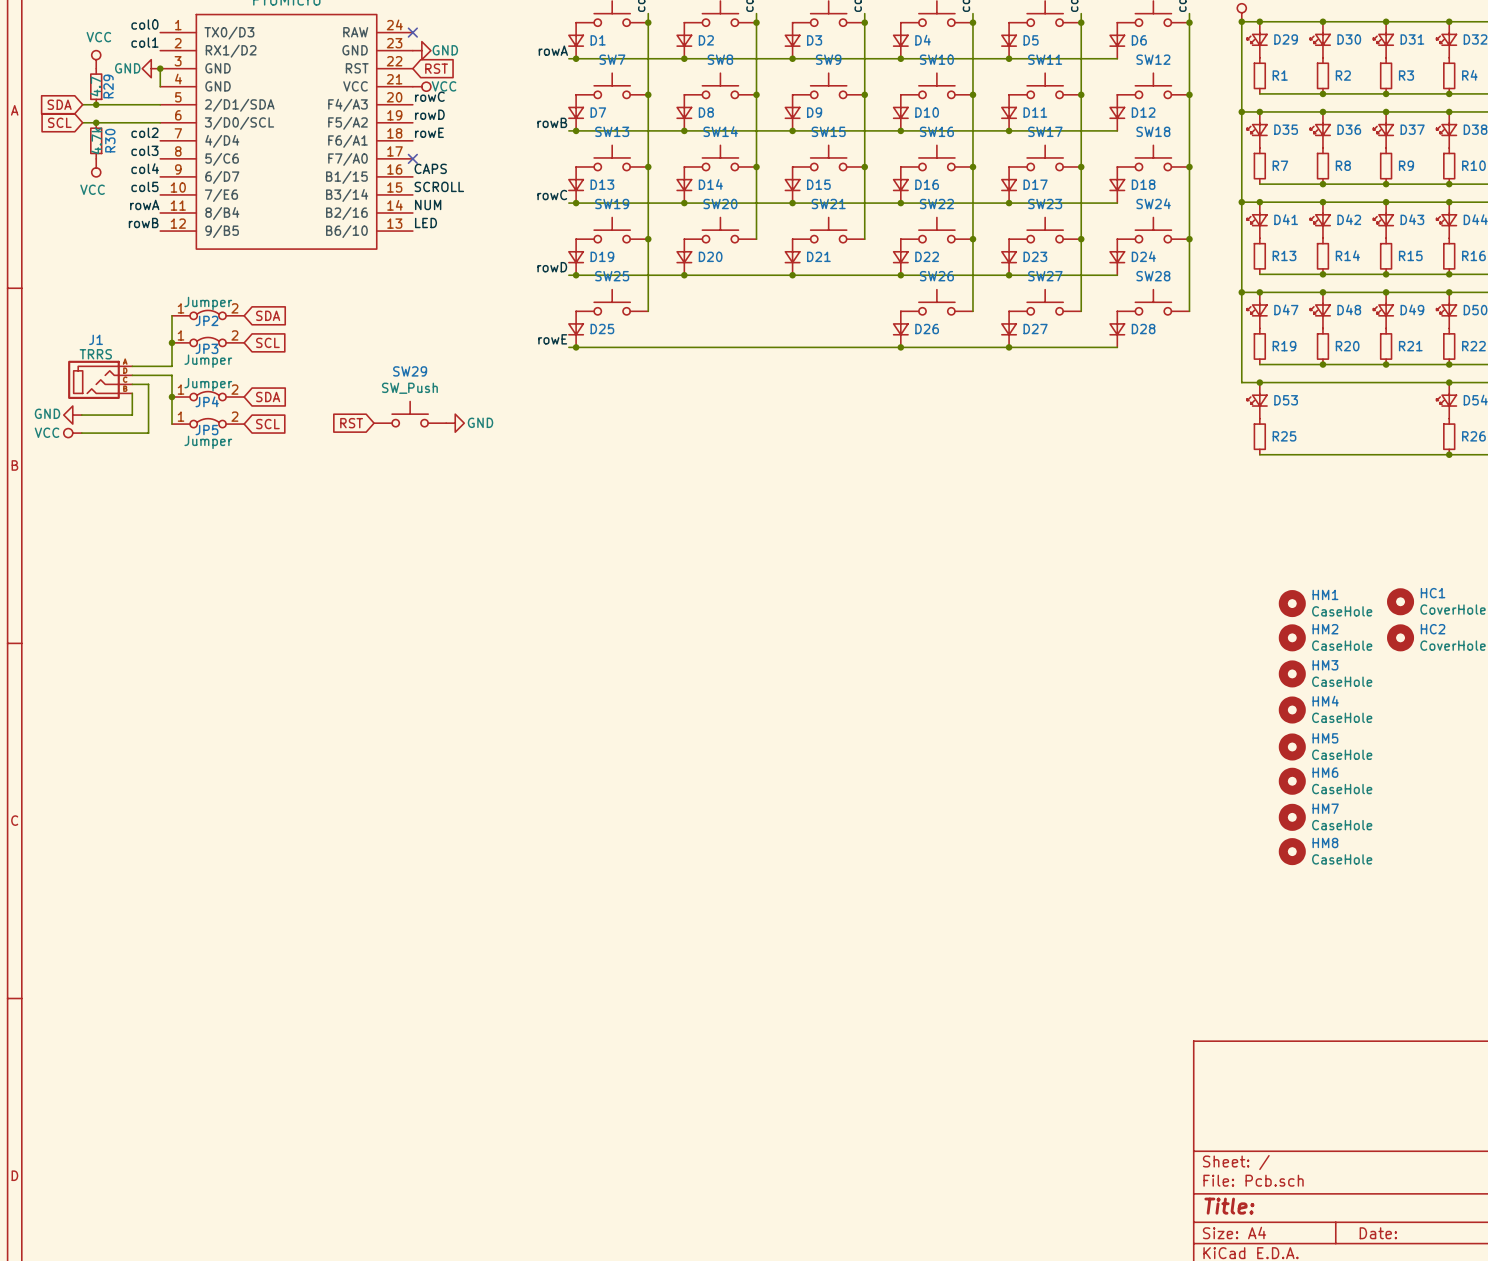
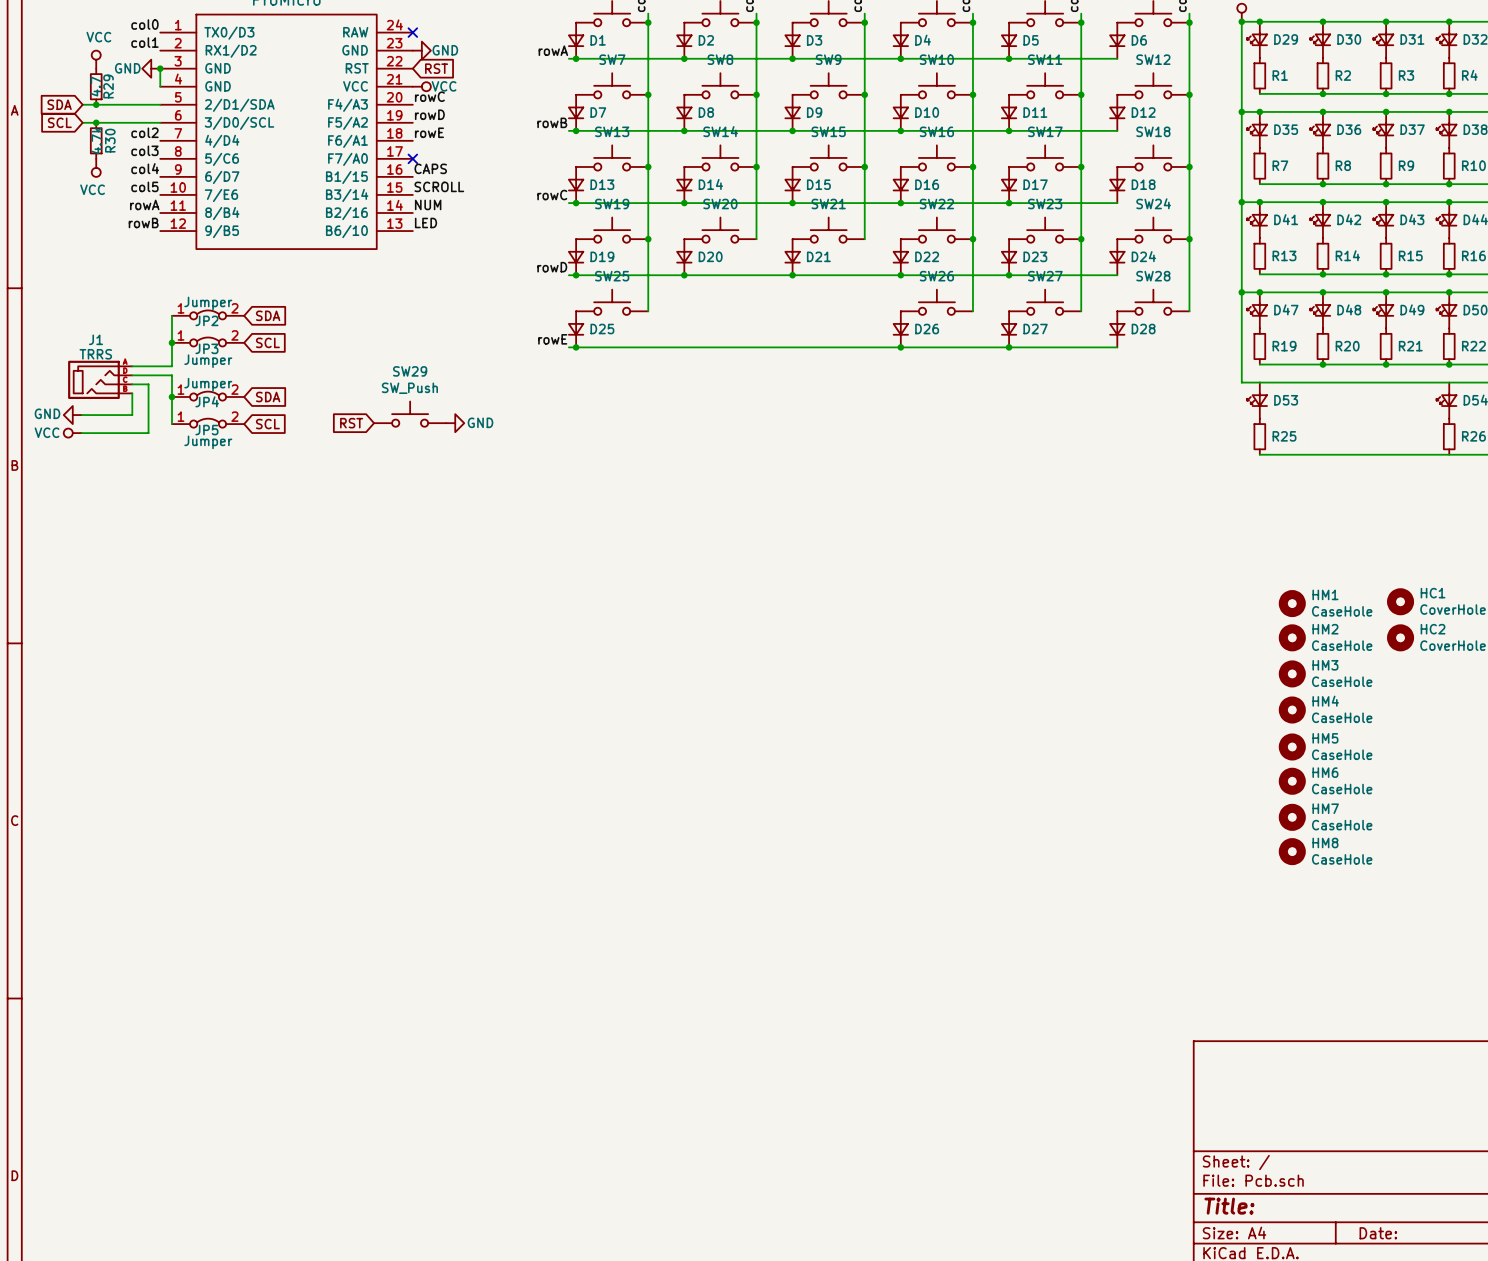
junction: (1259, 382) -> none
junction: (1449, 382) -> none
junction: (1449, 454) -> none

